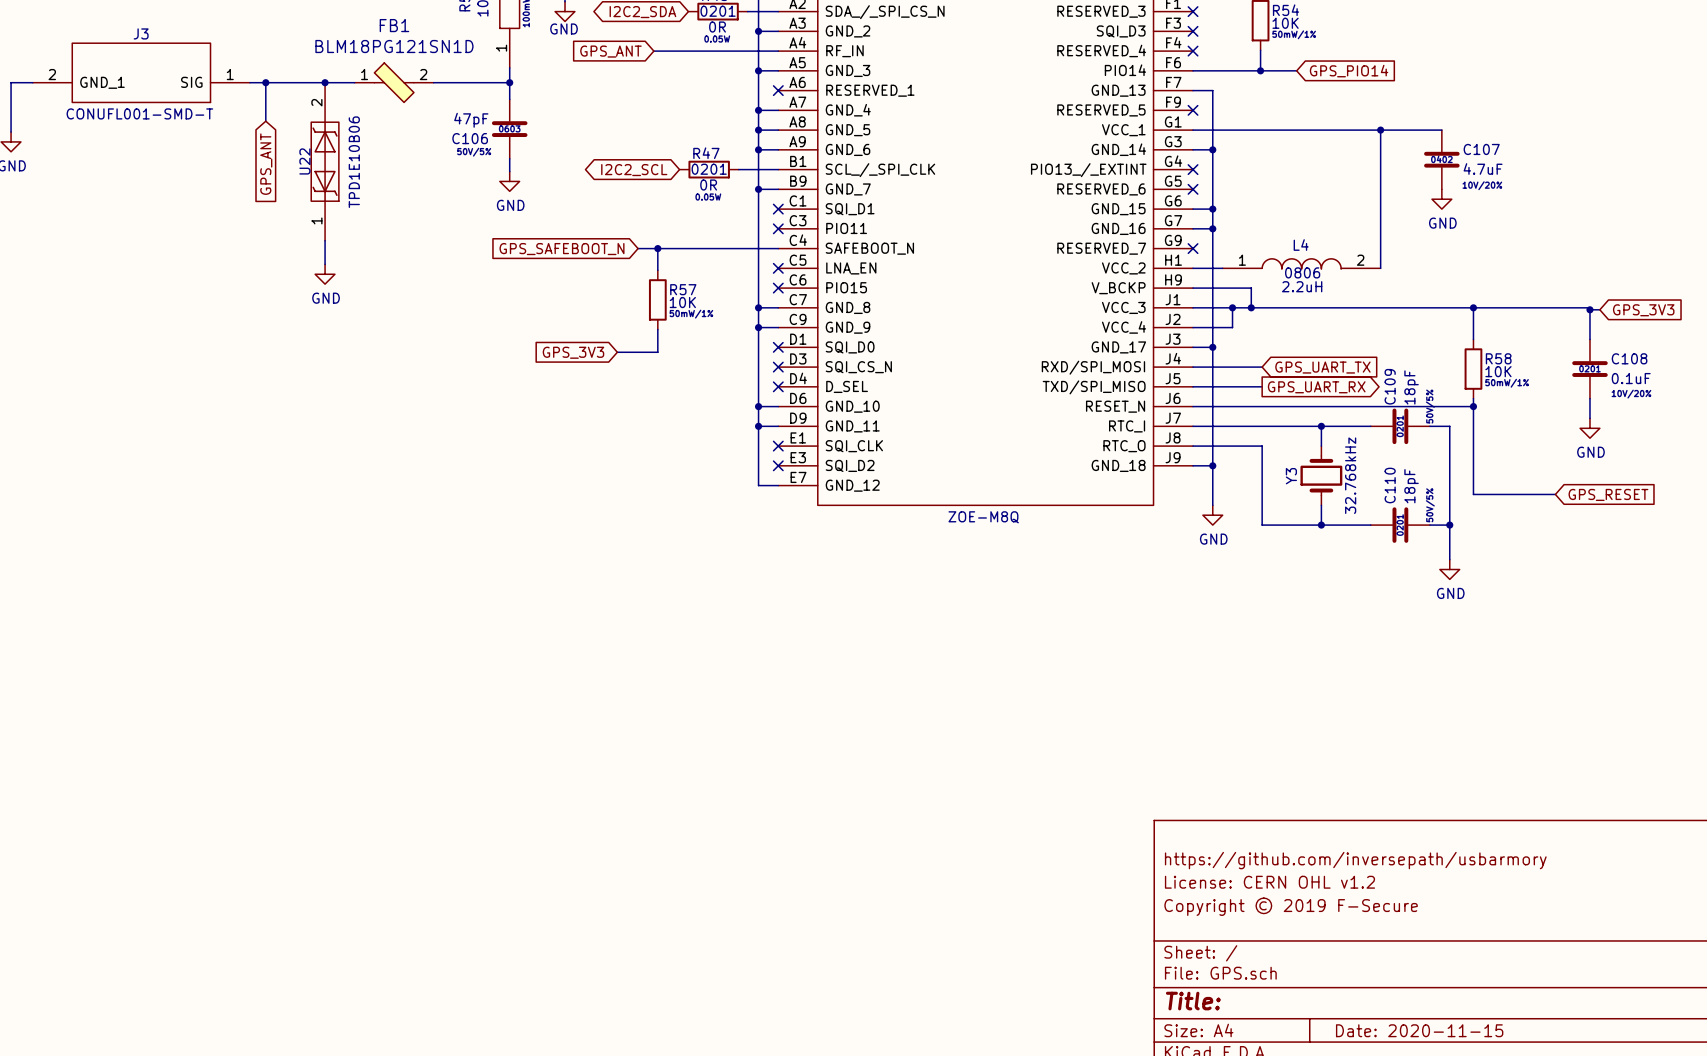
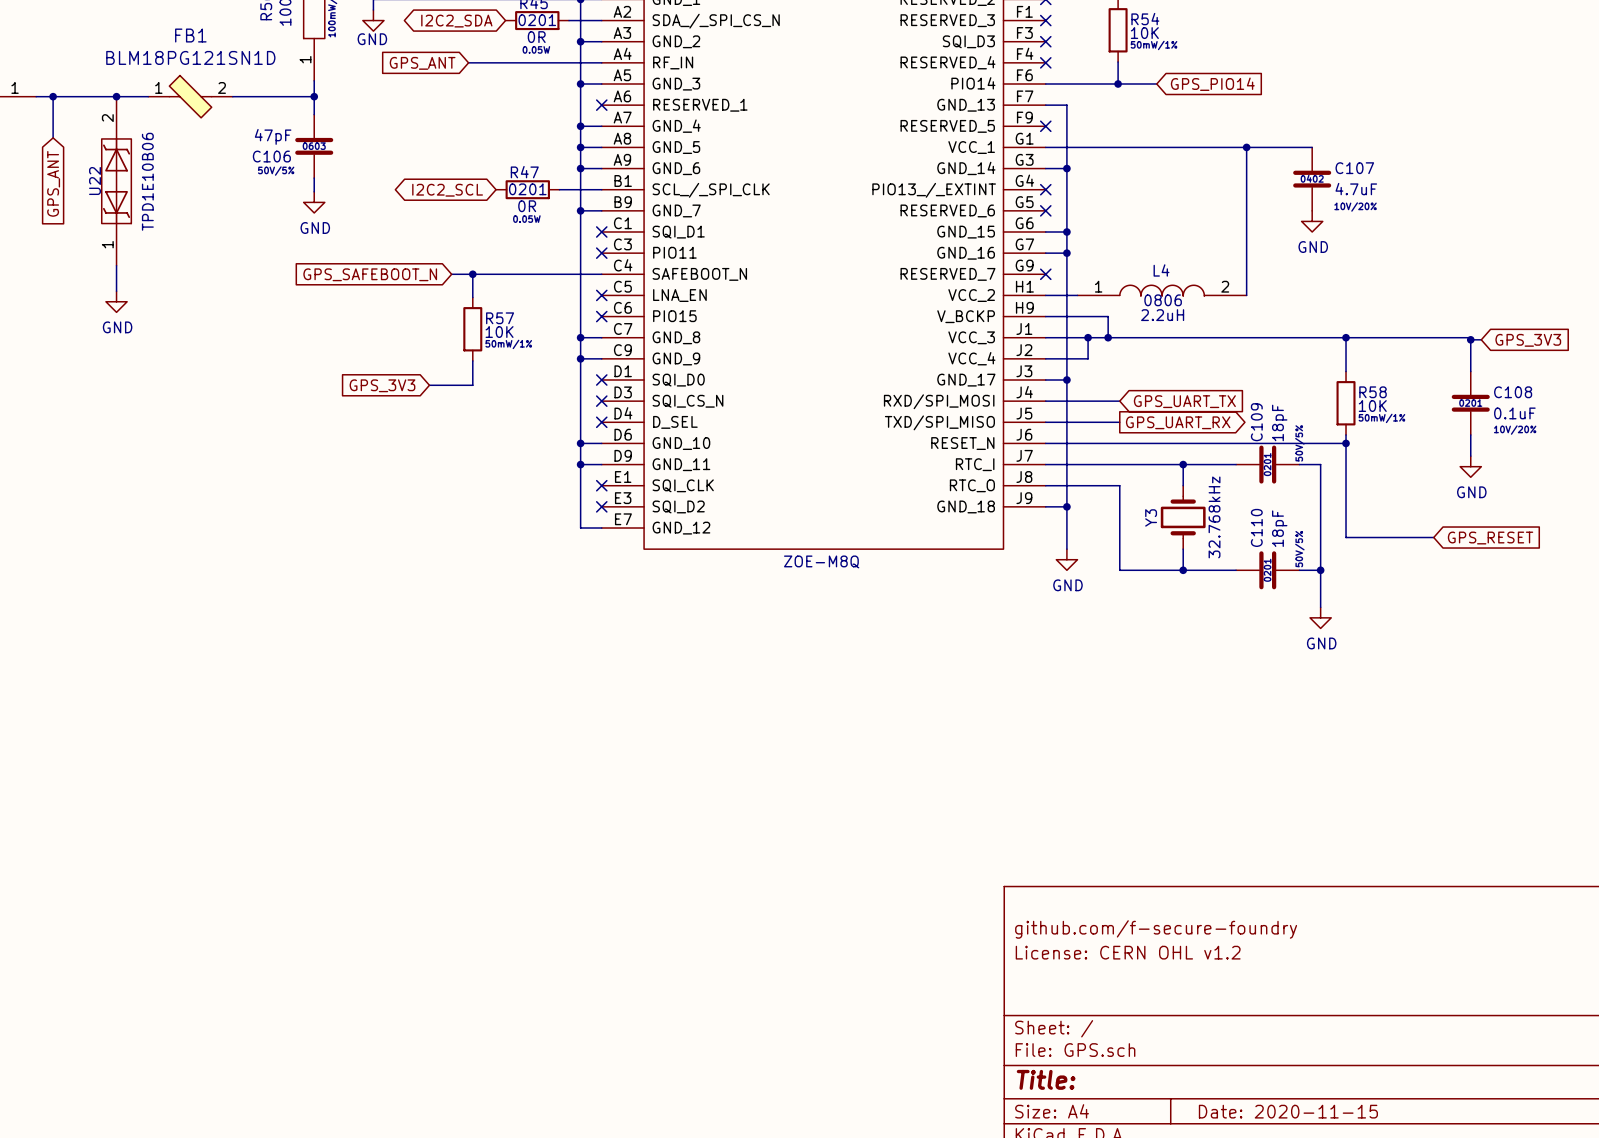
title block: https://github.com/inversepath/usbarmory (1355, 860) -> github.com/f-secure-foundry (1156, 929)
title block: Copyright © 2019 F-Secure (1291, 906) -> none

